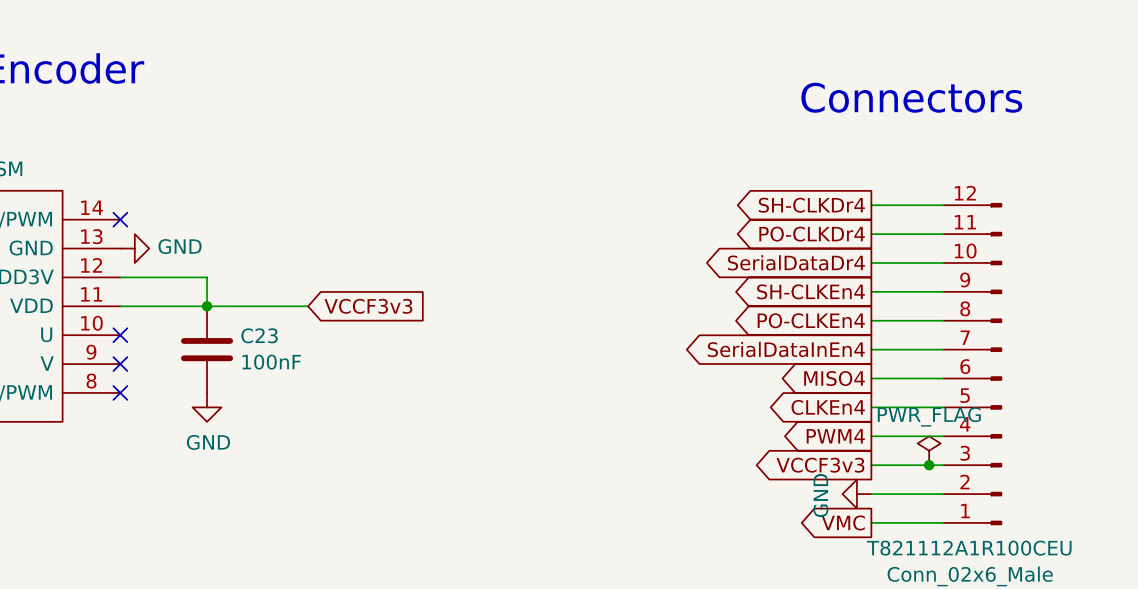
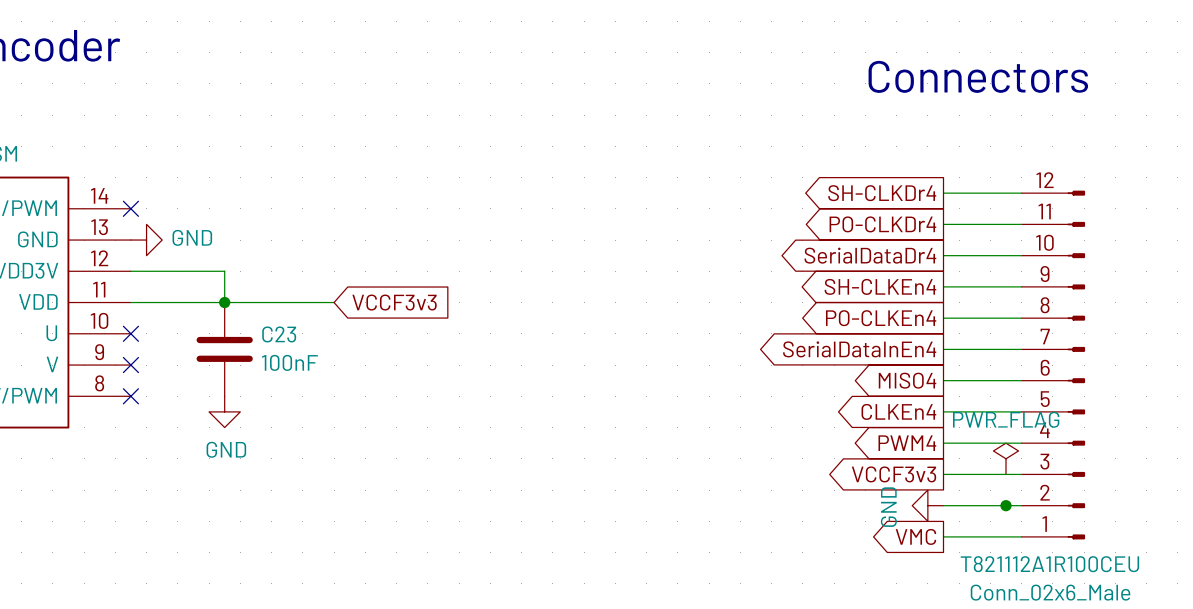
junction position: (929, 465) -> (1006, 505)

